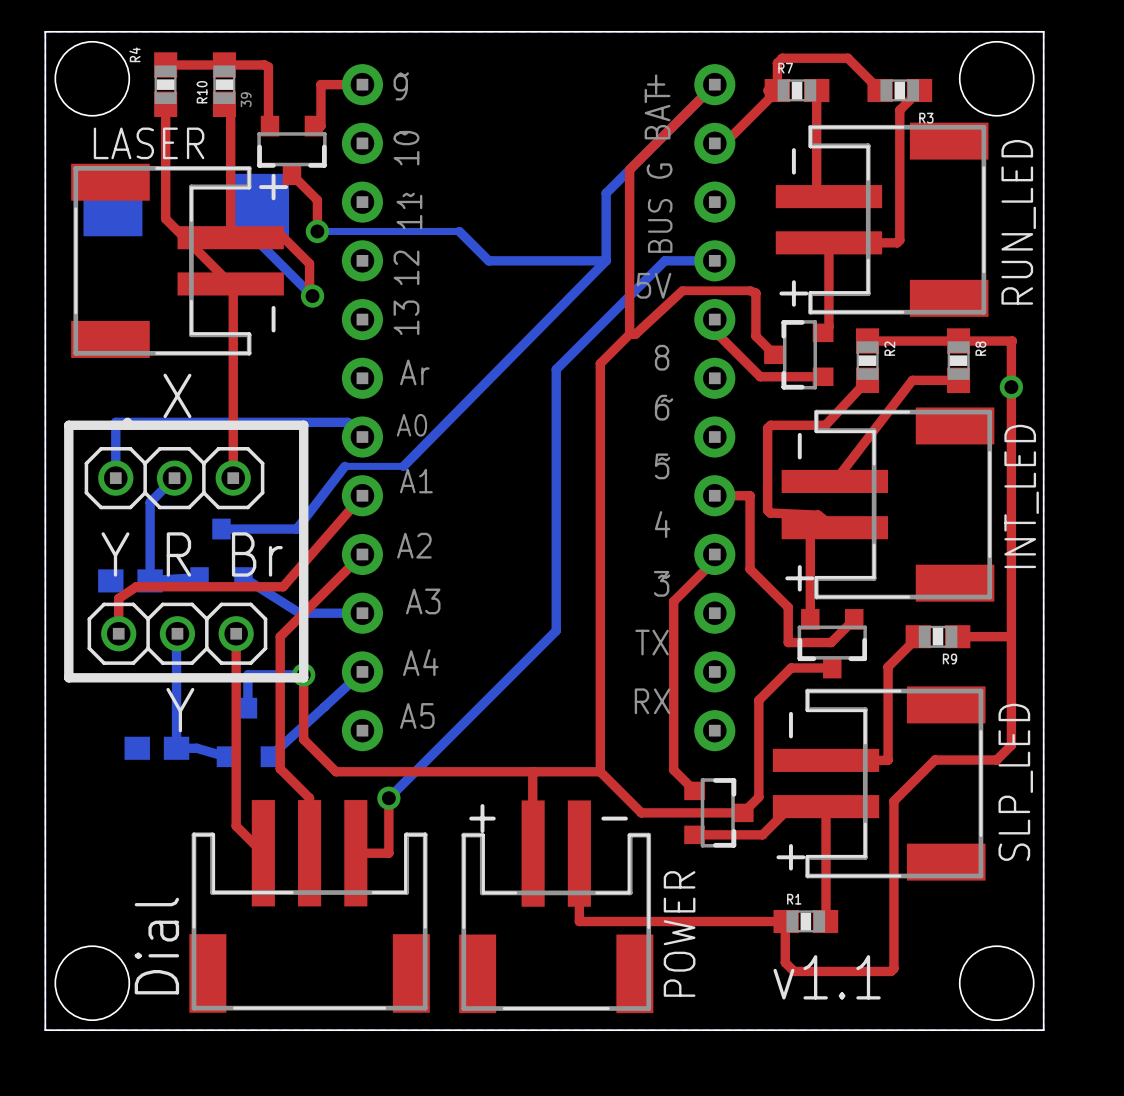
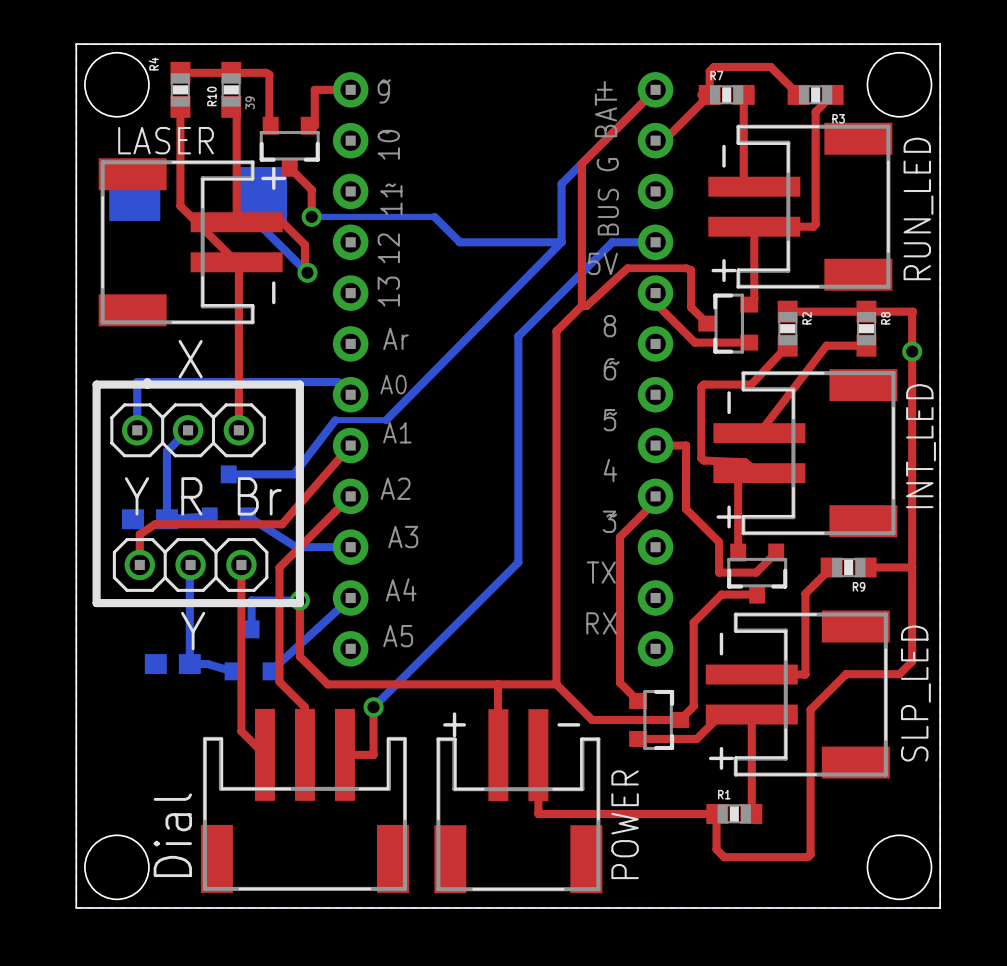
text: v1.1 (827, 977) -> none

